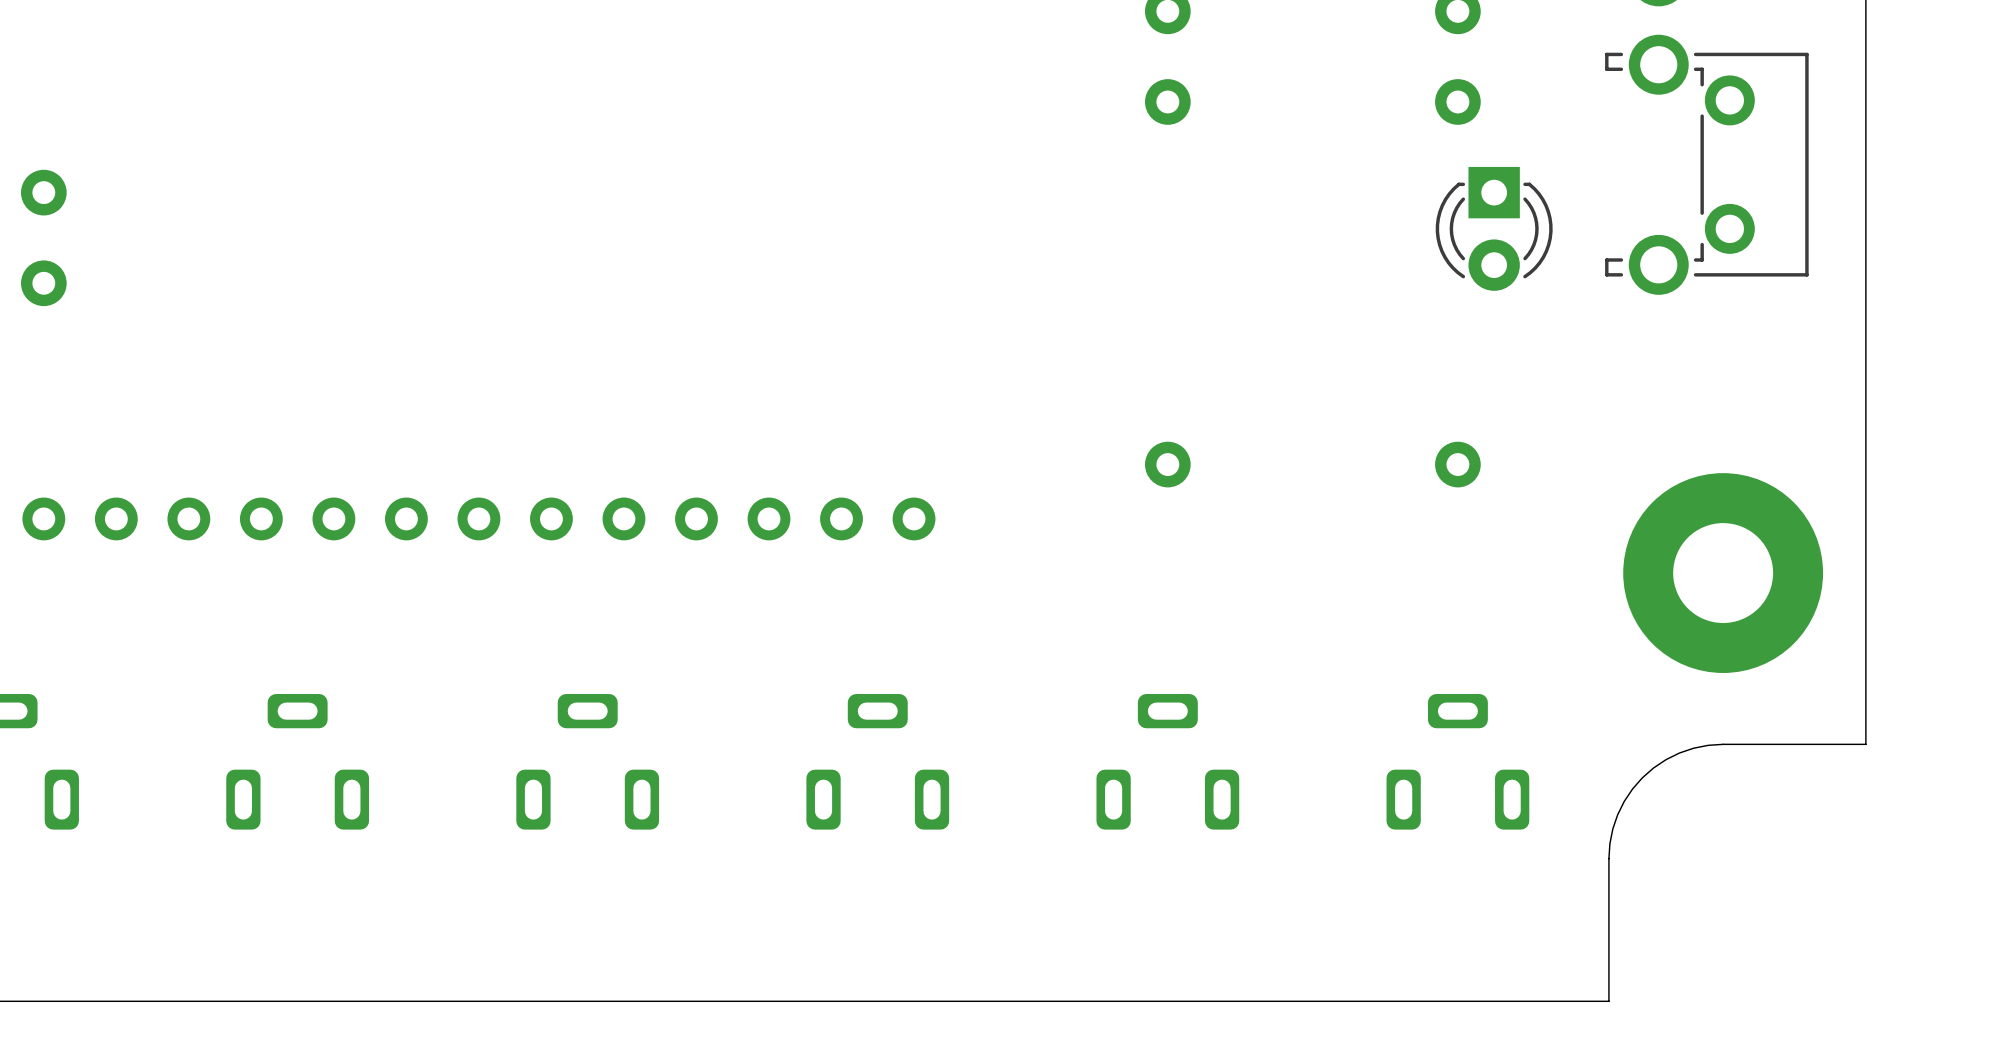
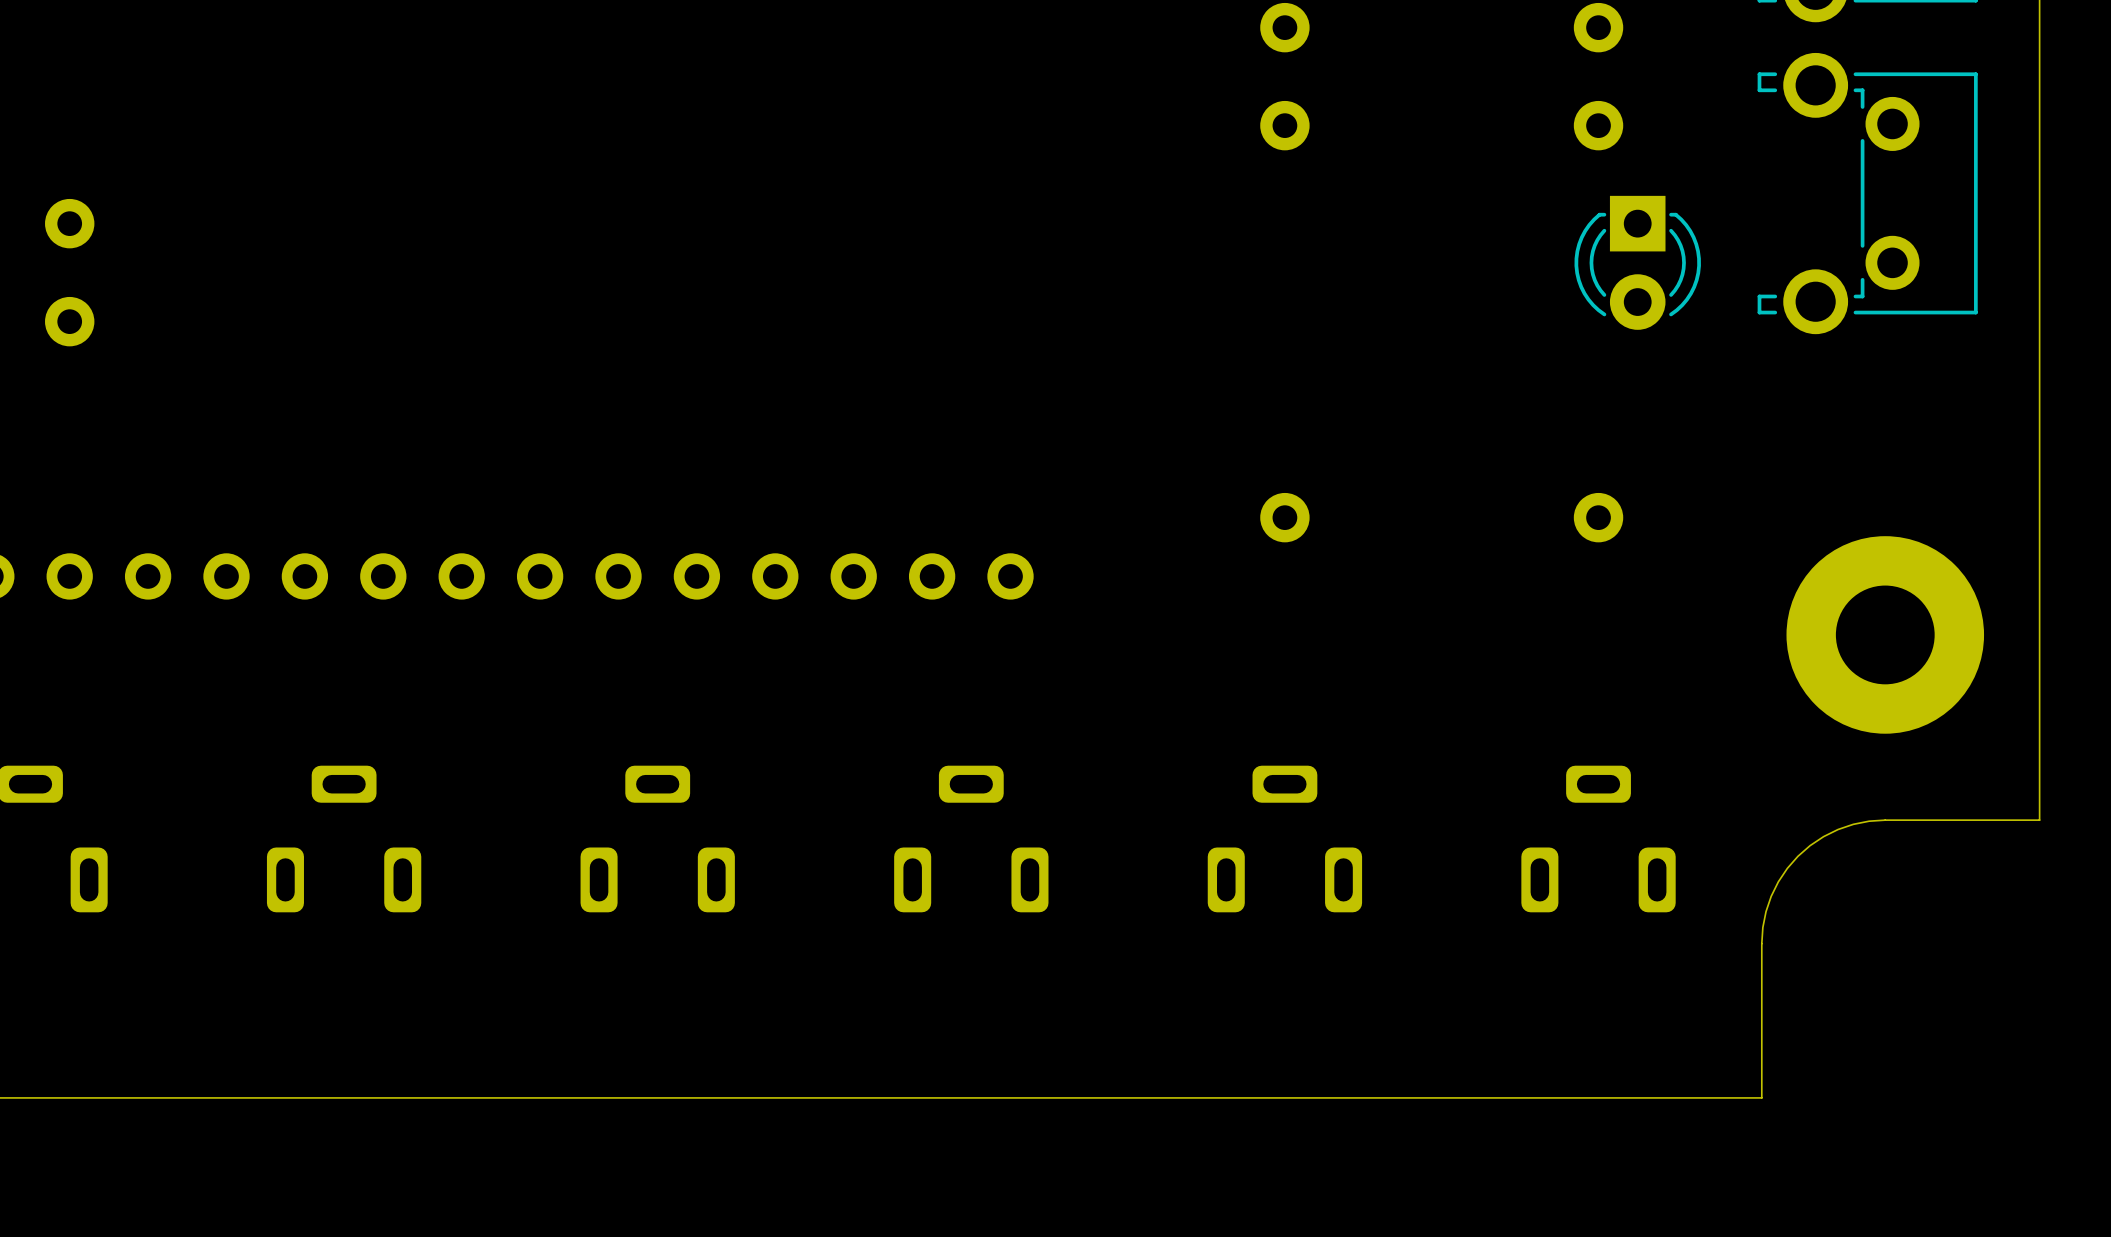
part footprint: [1623, 473, 1824, 673] -> [1786, 536, 1985, 734]

